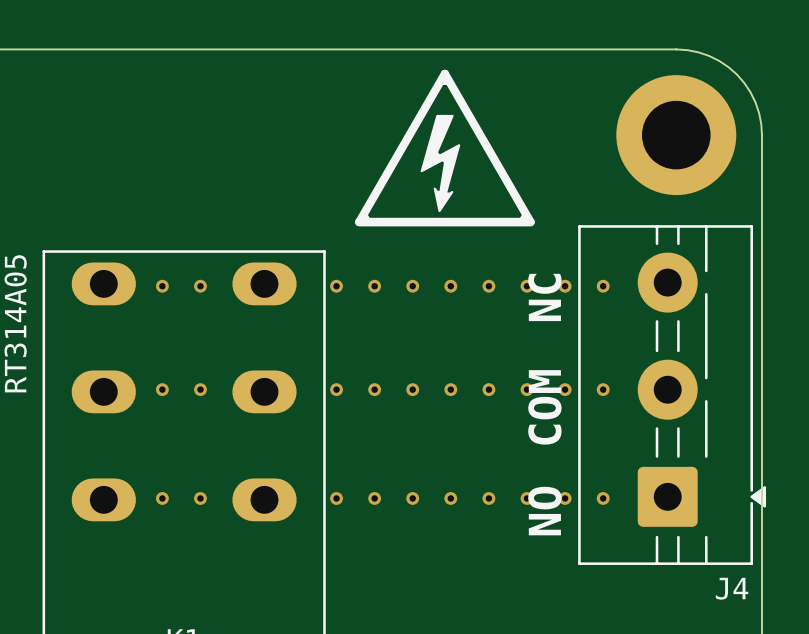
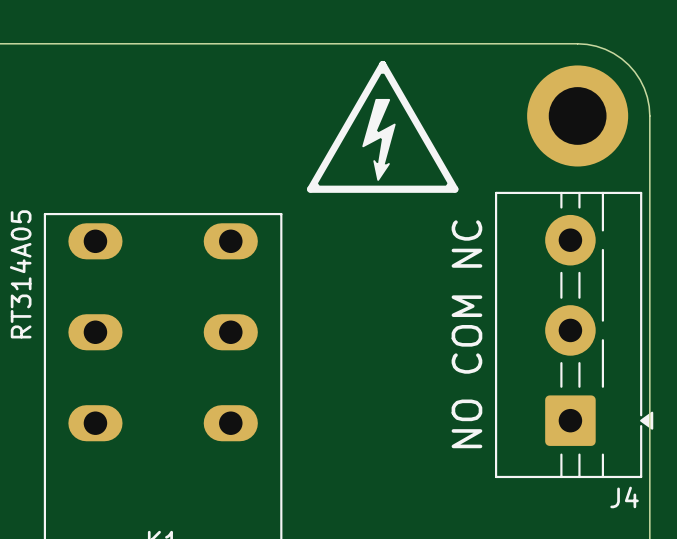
via: (162, 286) -> none
via: (200, 286) -> none
via: (336, 286) -> none
via: (374, 286) -> none
via: (412, 286) -> none
via: (450, 286) -> none
via: (488, 286) -> none
via: (527, 286) -> none
via: (565, 286) -> none
via: (603, 286) -> none
via: (162, 389) -> none
via: (200, 389) -> none
via: (336, 389) -> none
via: (374, 389) -> none
via: (412, 389) -> none
via: (450, 389) -> none
via: (488, 389) -> none
via: (527, 389) -> none
via: (565, 389) -> none
via: (603, 389) -> none
via: (162, 498) -> none
via: (200, 498) -> none
via: (336, 498) -> none
via: (374, 498) -> none
via: (412, 498) -> none
via: (450, 498) -> none
via: (488, 498) -> none
via: (527, 498) -> none
via: (565, 498) -> none
via: (603, 498) -> none

